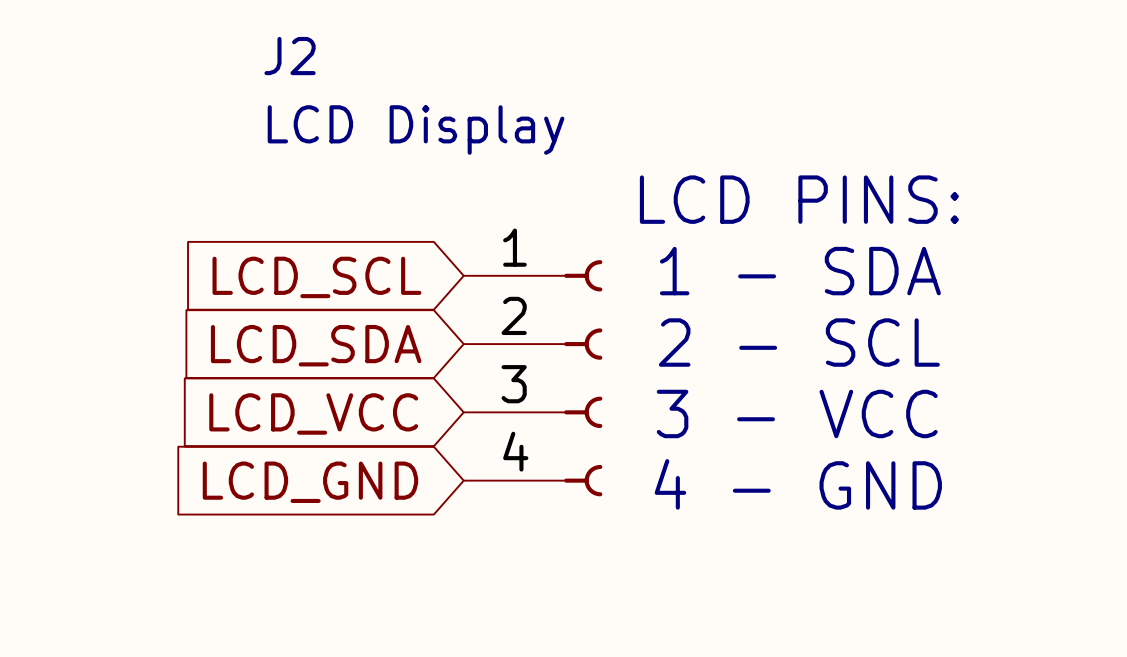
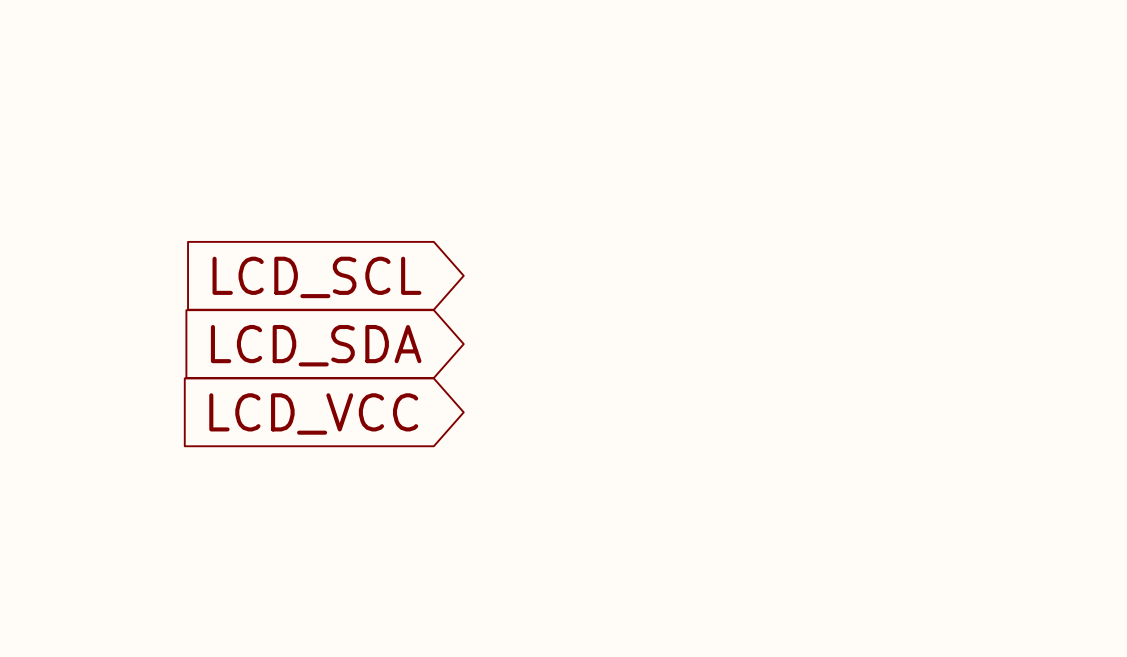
text: LCD PINS: (799, 199) -> none
text: 1 - SDA (800, 271) -> none
text: 2 - SCL (799, 342) -> none
J2: LCD Display (533, 378) -> none
text: 3 - VCC (797, 413) -> none
global label: LCD_GND (310, 482) -> none
text: 4 - GND (798, 484) -> none

